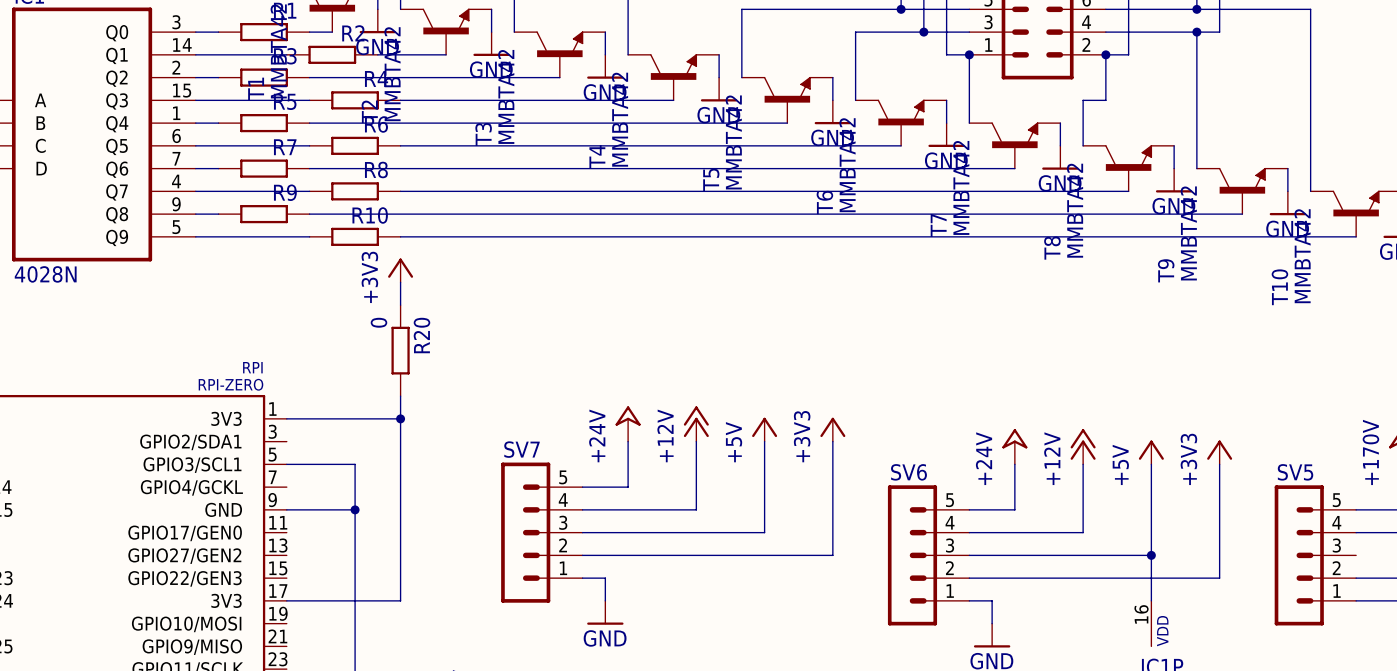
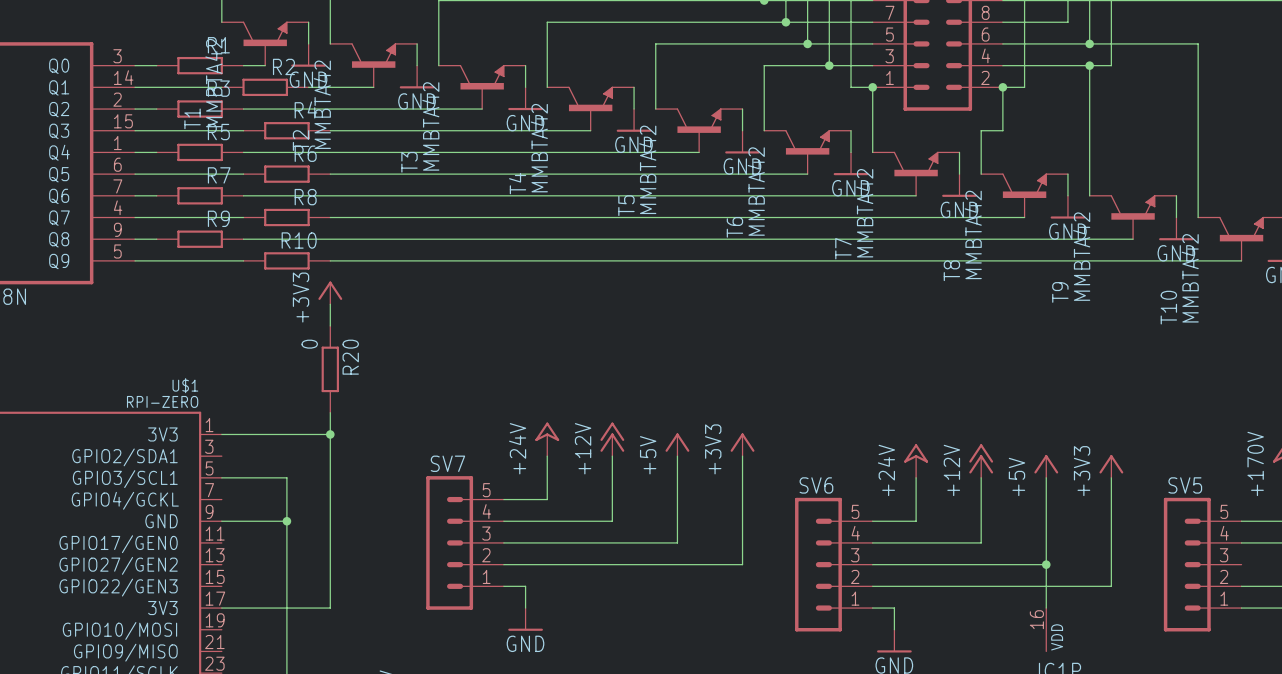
RPI name: RPI (252, 367) -> U$1 (185, 385)

